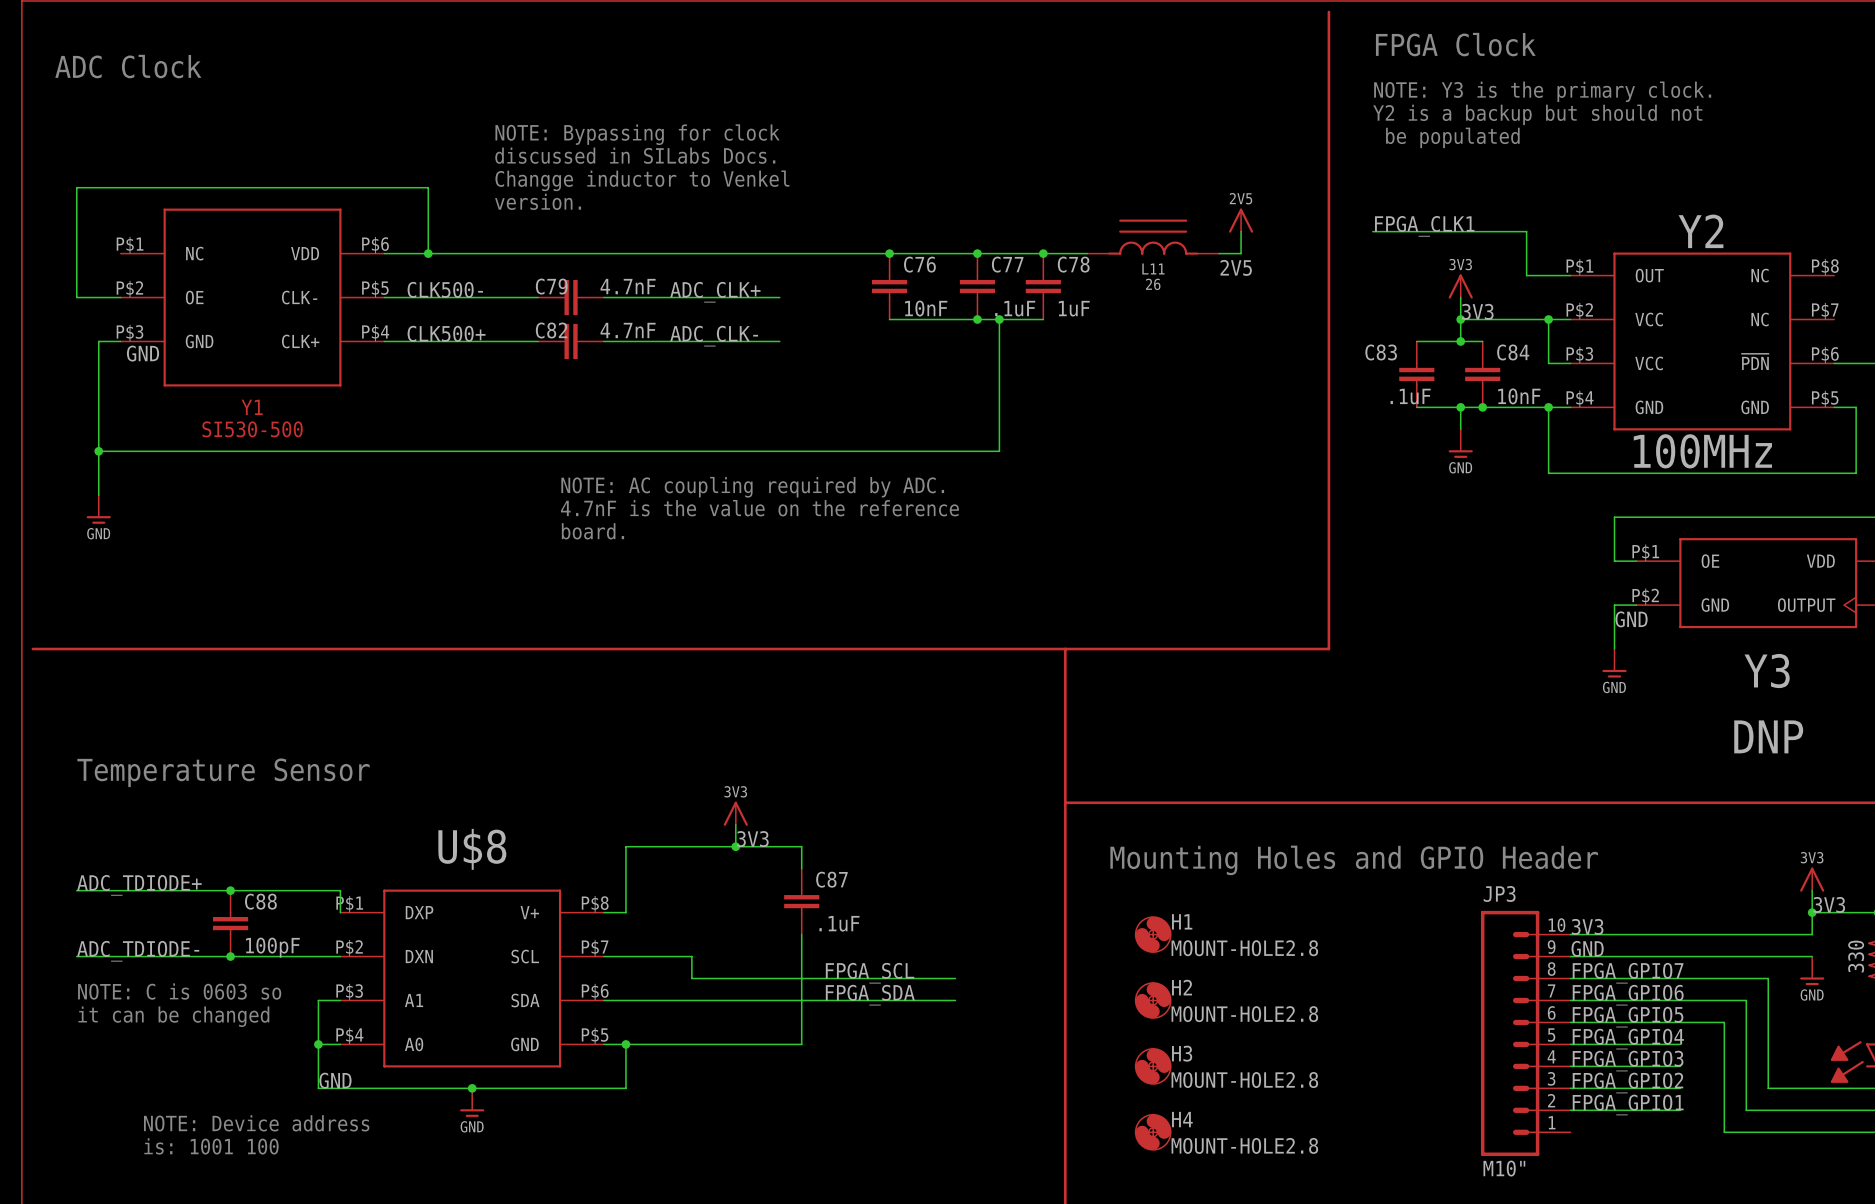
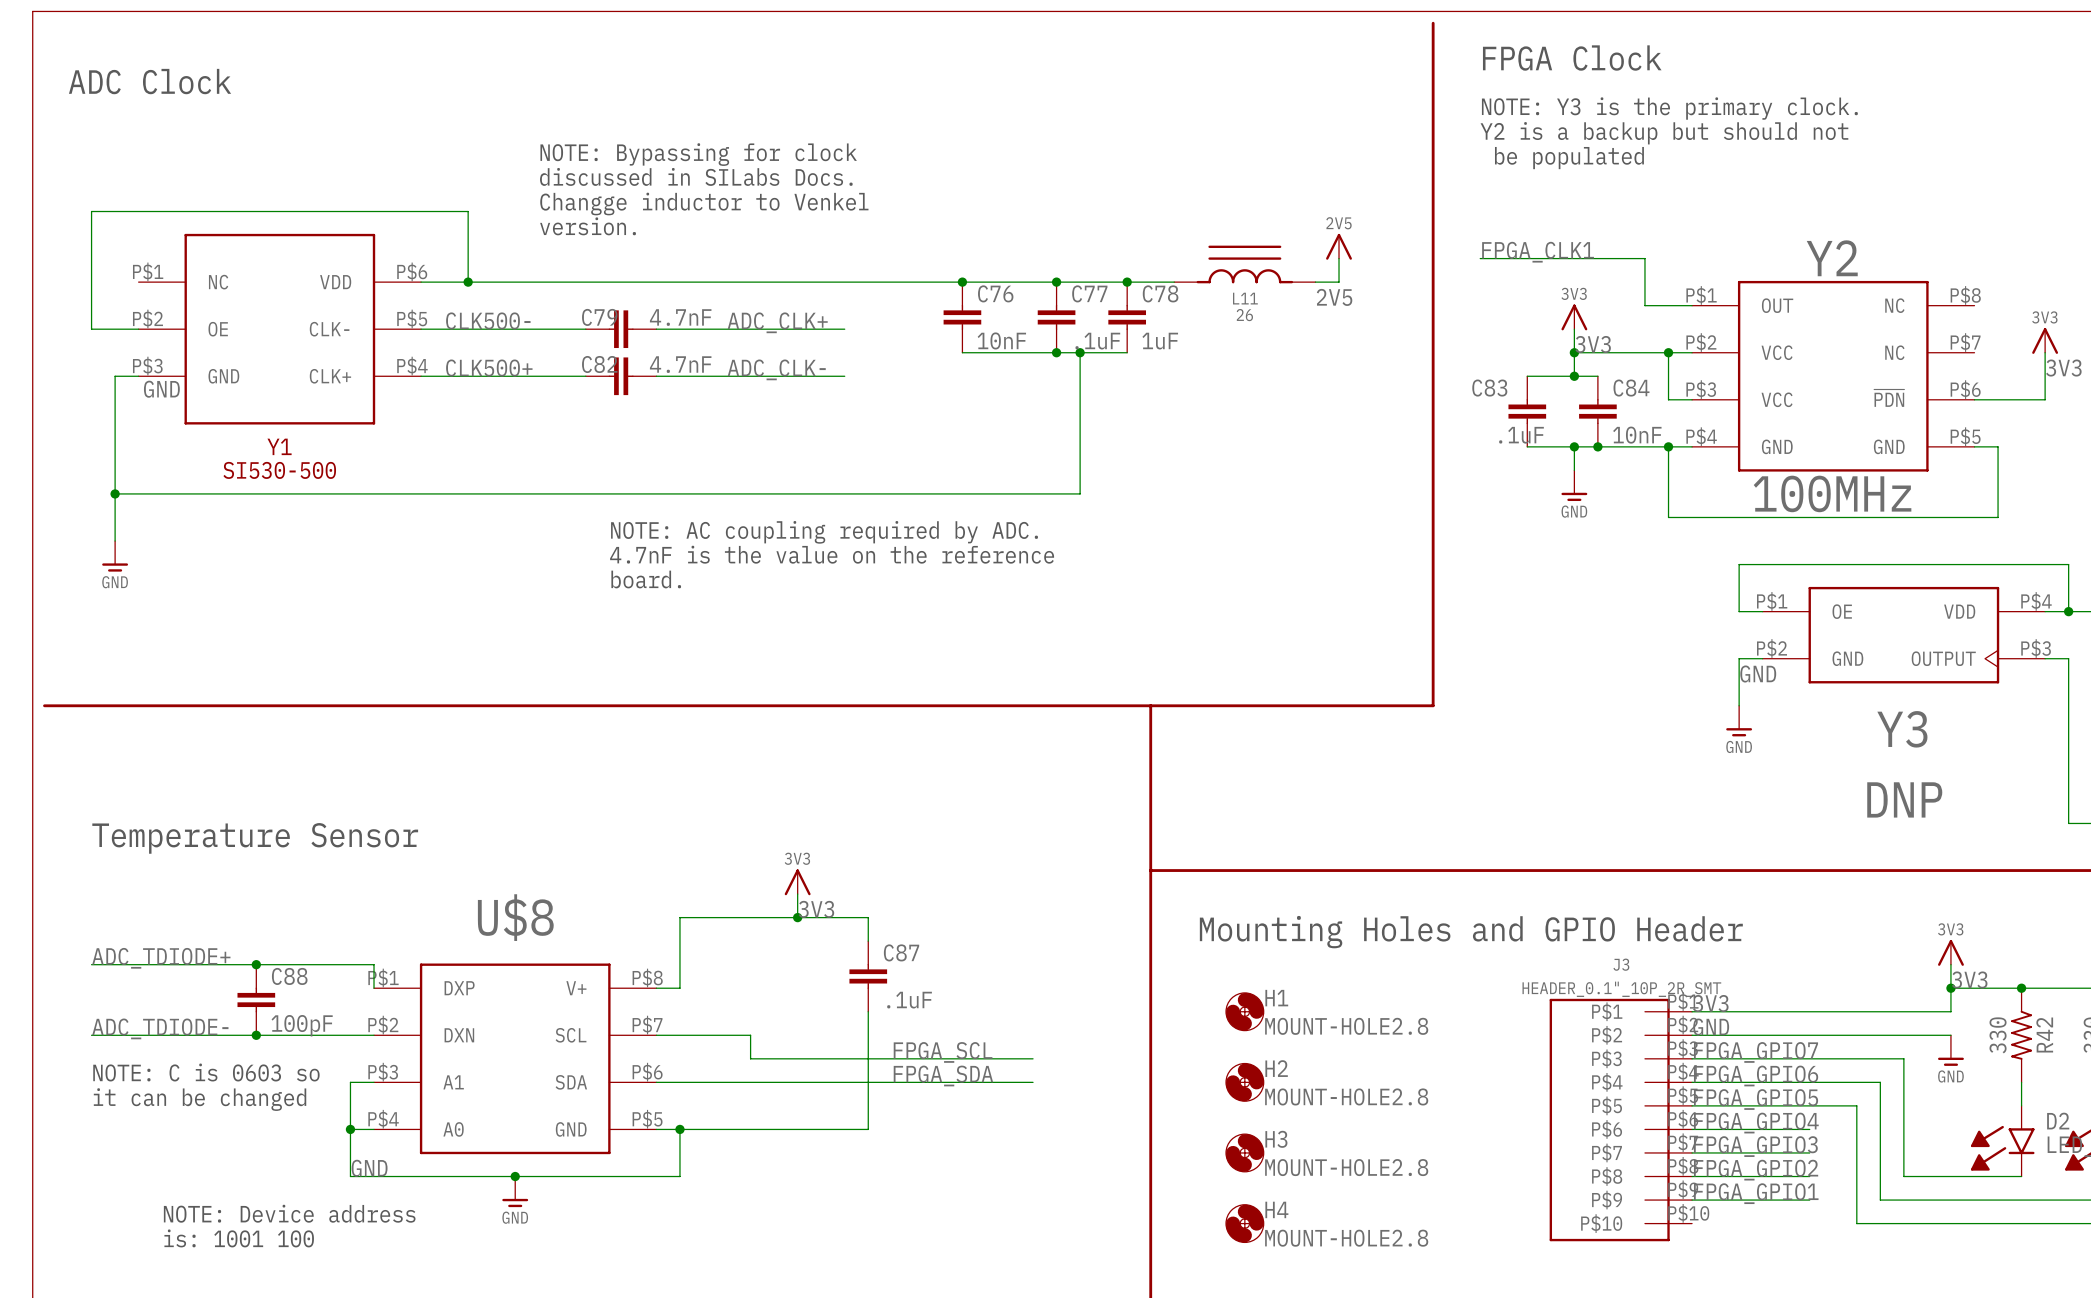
JP3: M10" (1525, 1033) -> none
J3: none -> HEADER_0.1"_10P_2R_SMT (1620, 1120)

